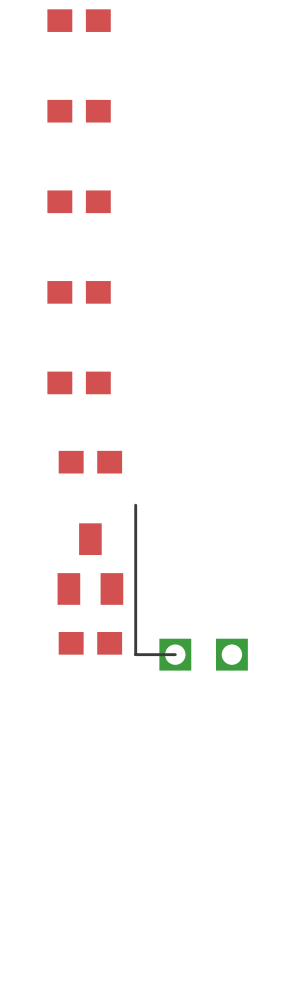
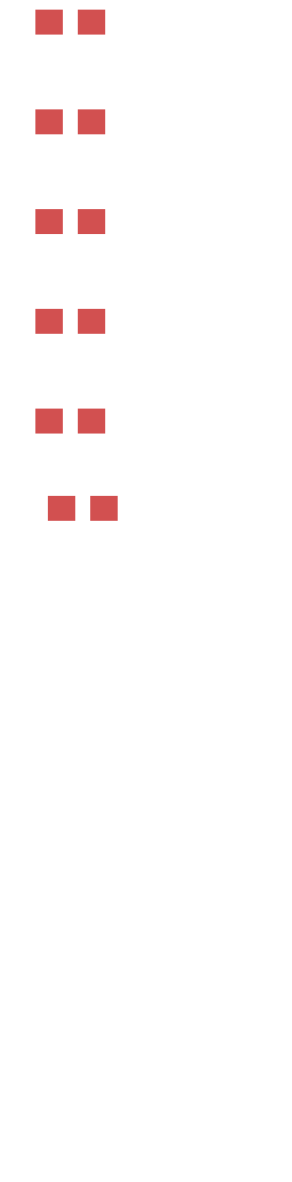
part: (90, 564) -> none
part: (191, 587) -> none
part: (90, 643) -> none

